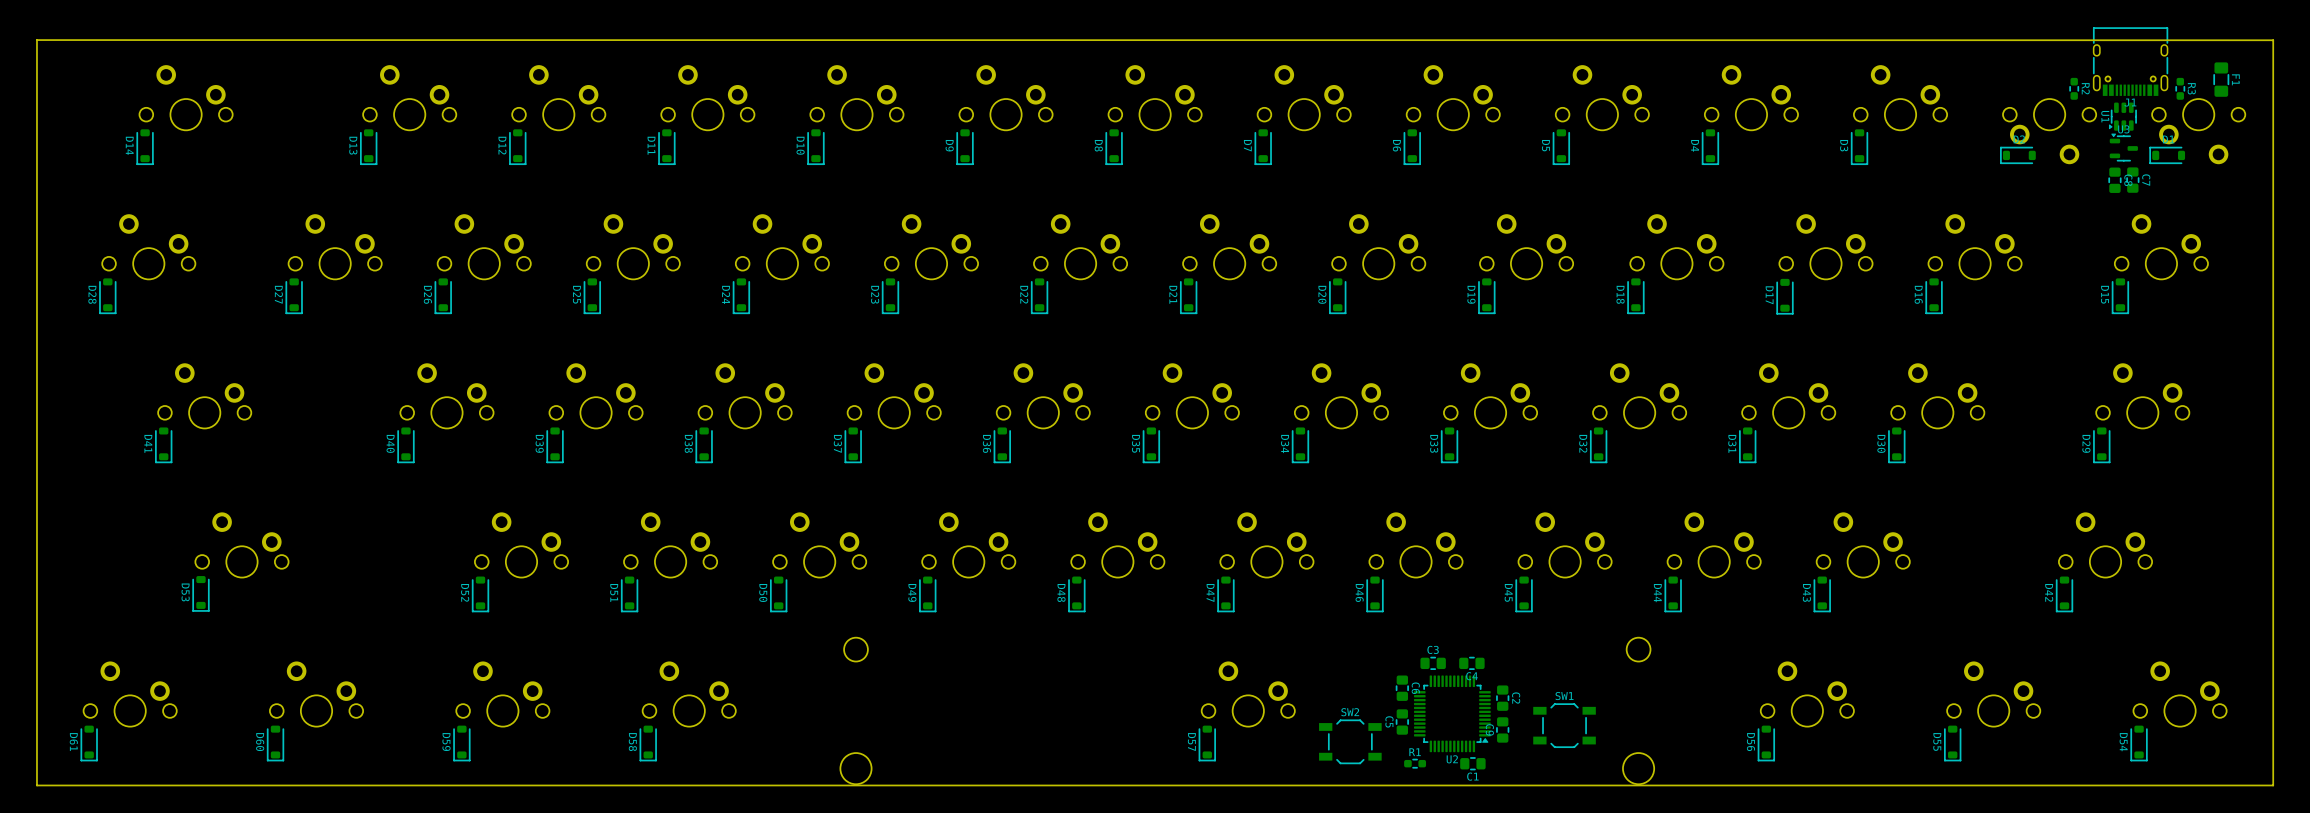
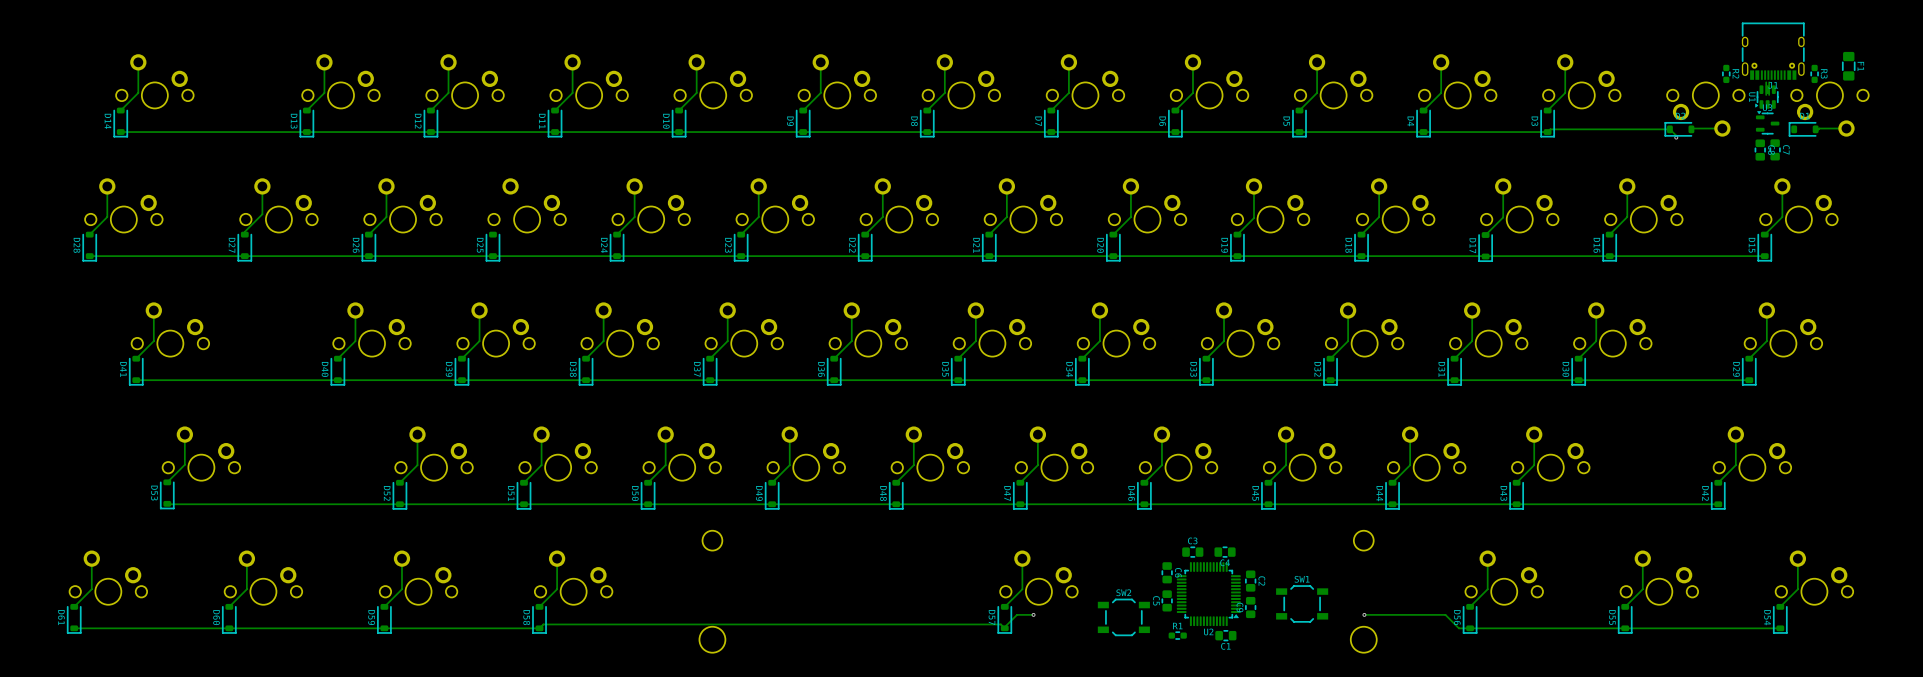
board edge: (36, 40) (2273, 40) (2273, 785) (36, 785) (36, 40) -> none
track: none -> (138, 62) (138, 92) (120, 110)
track: none -> (324, 62) (324, 92) (306, 110)
track: none -> (448, 62) (448, 92) (430, 110)
track: none -> (572, 62) (572, 92) (555, 110)
track: none -> (696, 62) (696, 92) (679, 110)
track: none -> (820, 62) (820, 92) (803, 110)
track: none -> (944, 62) (944, 92) (927, 110)
track: none -> (1068, 62) (1068, 92) (1051, 110)
track: none -> (1192, 62) (1192, 92) (1175, 110)
track: none -> (1317, 62) (1317, 92) (1299, 110)
track: none -> (1441, 62) (1441, 92) (1423, 110)
track: none -> (1565, 62) (1565, 92) (1547, 110)
track: none -> (1766, 82) (1766, 94)
track: none -> (1769, 82) (1769, 94)
track: none -> (1722, 128) (1691, 129)
track: none -> (1846, 128) (1819, 128) (1816, 131)
track: none -> (120, 132) (1547, 132) (1550, 129) (1669, 129) (1676, 137)
via: none -> (1676, 137)
track: none -> (107, 186) (107, 217) (89, 234)
track: none -> (262, 186) (262, 214) (244, 231) (244, 234)
track: none -> (386, 186) (386, 217) (368, 234)
track: none -> (634, 186) (634, 217) (617, 234)
track: none -> (758, 186) (758, 217) (741, 234)
track: none -> (882, 186) (882, 217) (865, 234)
track: none -> (1006, 186) (1006, 217) (989, 234)
track: none -> (1130, 186) (1130, 217) (1113, 234)
track: none -> (1254, 186) (1254, 218) (1237, 234)
track: none -> (1379, 186) (1379, 217) (1361, 234)
track: none -> (1503, 186) (1503, 217) (1485, 235)
track: none -> (1627, 186) (1627, 217) (1609, 234)
track: none -> (1782, 186) (1782, 217) (1764, 234)
track: none -> (1764, 256) (89, 256)
track: none -> (153, 310) (153, 341) (136, 358)
track: none -> (355, 310) (355, 341) (337, 358)
track: none -> (479, 310) (479, 341) (461, 358)
track: none -> (603, 310) (603, 341) (586, 358)
track: none -> (727, 310) (727, 341) (710, 358)
track: none -> (851, 310) (851, 341) (834, 358)
track: none -> (975, 310) (975, 341) (958, 358)
track: none -> (1099, 310) (1099, 341) (1082, 358)
track: none -> (1224, 310) (1224, 341) (1206, 358)
track: none -> (1348, 310) (1348, 341) (1330, 358)
track: none -> (1472, 310) (1472, 341) (1454, 358)
track: none -> (1596, 310) (1596, 341) (1578, 358)
track: none -> (1766, 310) (1766, 341) (1749, 358)
track: none -> (1749, 380) (136, 380)
track: none -> (184, 434) (184, 464) (167, 482)
track: none -> (417, 434) (417, 465) (399, 482)
track: none -> (541, 434) (541, 465) (524, 482)
track: none -> (665, 434) (665, 465) (648, 482)
track: none -> (789, 434) (789, 465) (772, 482)
track: none -> (913, 434) (913, 465) (896, 482)
track: none -> (1037, 434) (1037, 465) (1020, 482)
track: none -> (1161, 434) (1161, 465) (1144, 482)
track: none -> (1286, 434) (1286, 465) (1268, 482)
track: none -> (1410, 434) (1410, 465) (1392, 482)
track: none -> (1534, 434) (1534, 465) (1516, 482)
track: none -> (1735, 434) (1735, 465) (1718, 482)
track: none -> (167, 503) (1718, 504)
track: none -> (91, 558) (91, 589) (74, 606)
track: none -> (246, 558) (246, 589) (229, 606)
track: none -> (401, 558) (401, 589) (384, 606)
track: none -> (557, 558) (557, 589) (539, 606)
track: none -> (1022, 558) (1022, 589) (1004, 606)
track: none -> (1487, 558) (1487, 589) (1470, 606)
track: none -> (1642, 558) (1642, 589) (1625, 606)
track: none -> (1797, 558) (1797, 589) (1780, 606)
track: none -> (1033, 614) (1017, 614) (1004, 628) (1000, 624) (543, 624) (539, 628) (74, 628)
via: none -> (1033, 614)
track: none -> (1364, 614) (1445, 614) (1458, 628) (1780, 628)
via: none -> (1364, 614)

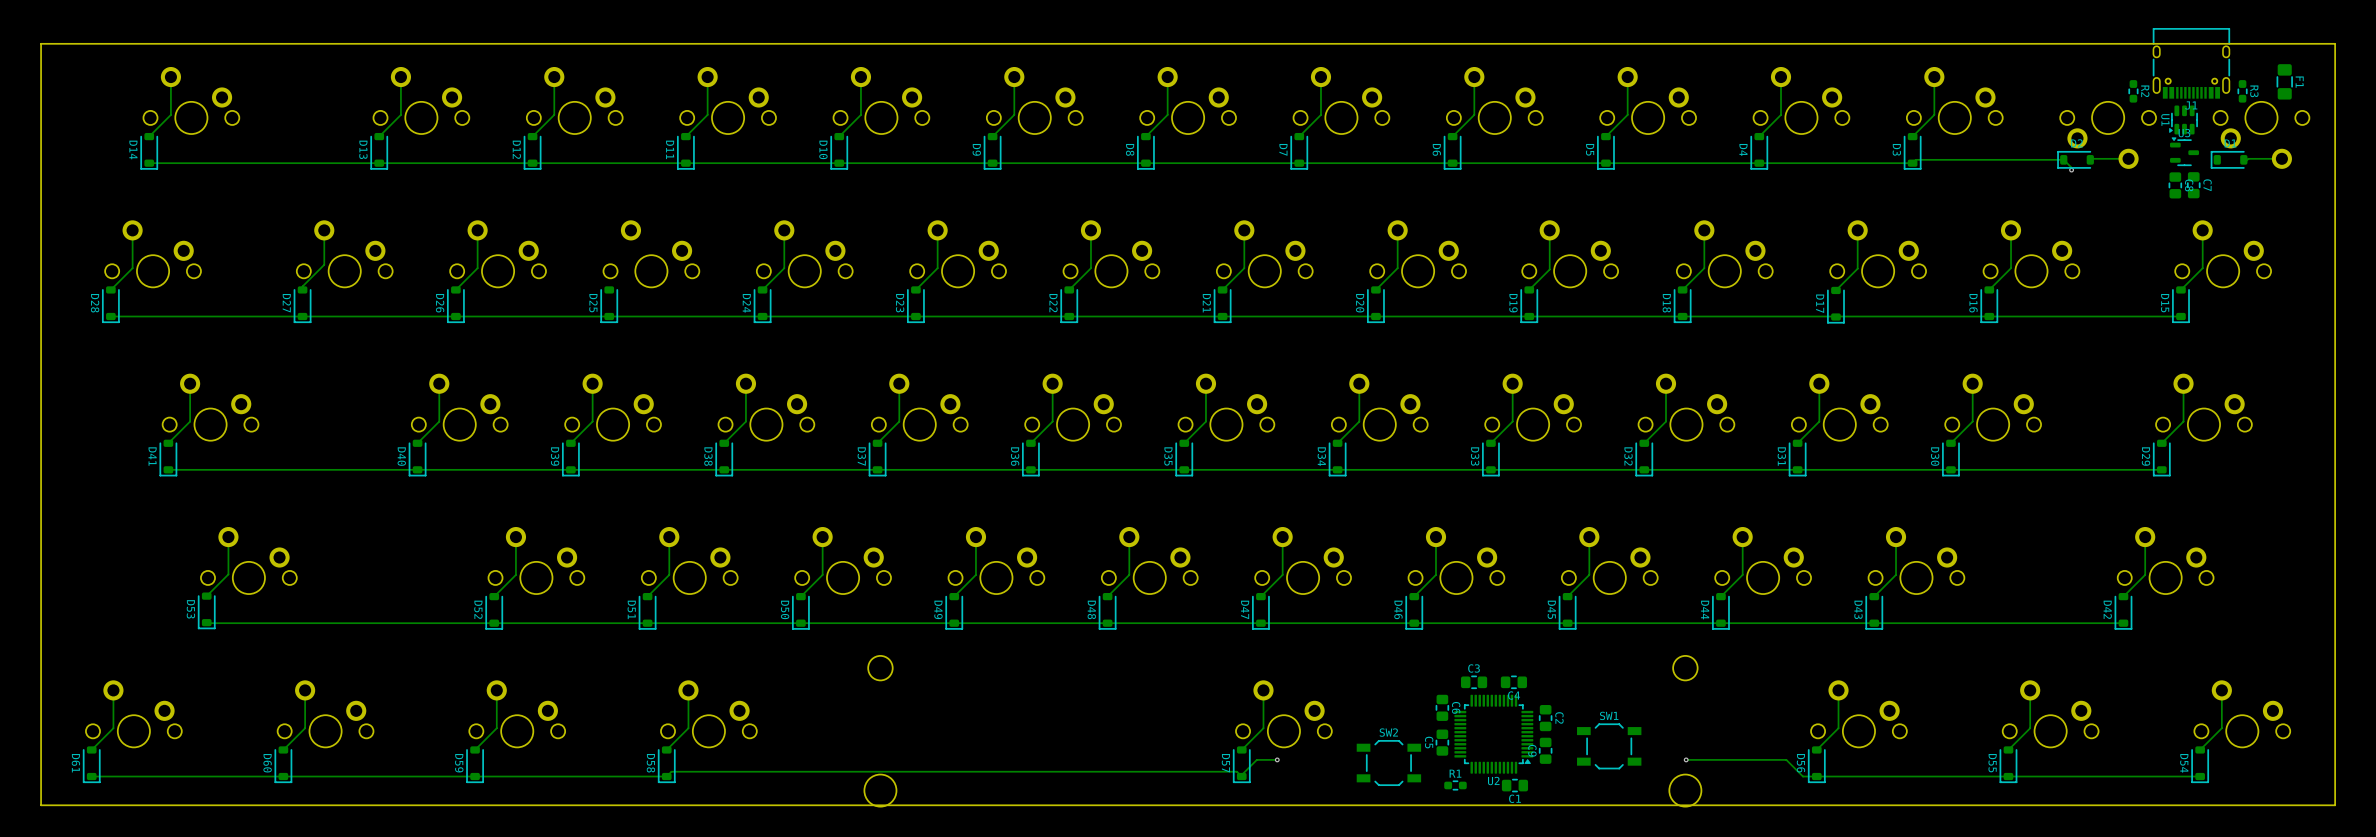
board edge: none -> (2335, 43) (41, 43) (41, 805) (2335, 805) (2335, 43)
track: (1766, 82) (1766, 94) -> none
track: (1769, 82) (1769, 94) -> none

